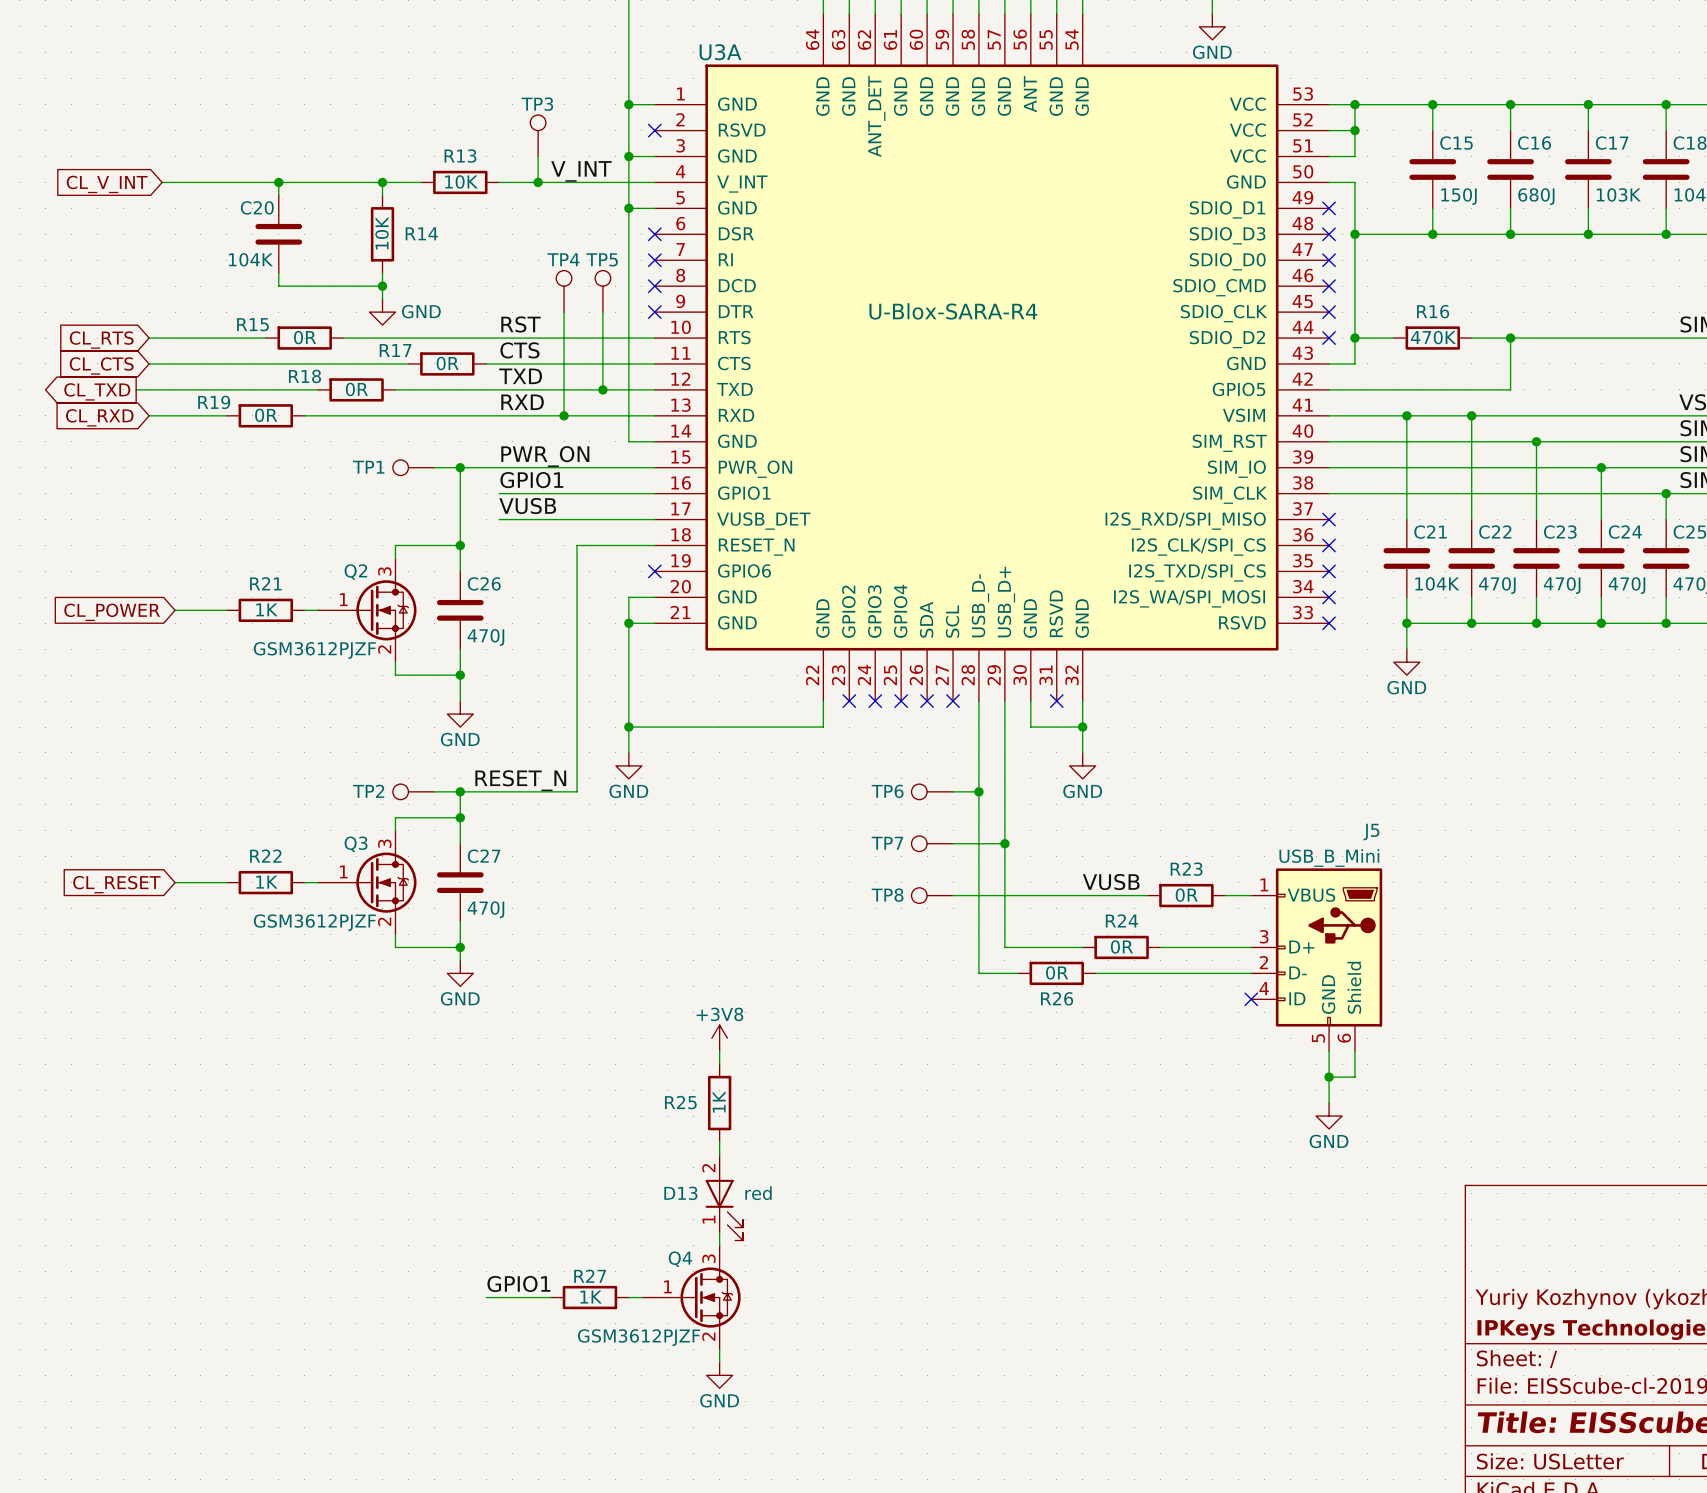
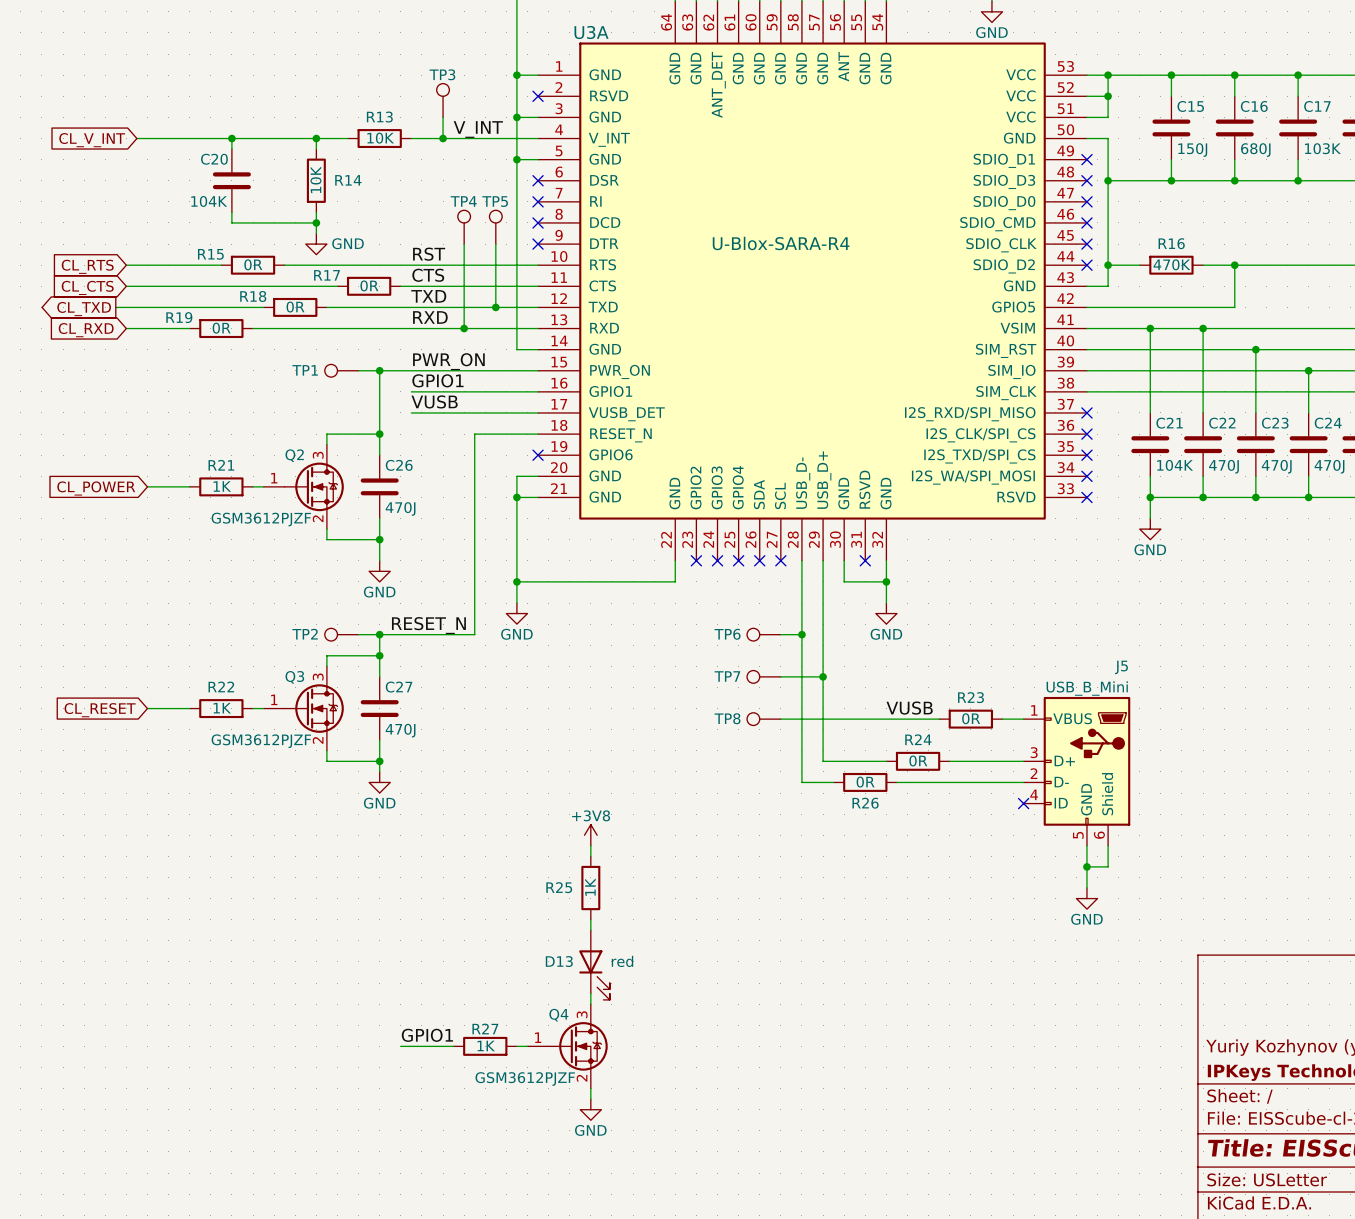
Q2 symbol: [317, 558, 417, 663] -> [263, 444, 344, 530]
Q3 symbol: [317, 830, 417, 935] -> [263, 666, 344, 751]
D13 symbol: [705, 1154, 743, 1241] -> [579, 930, 610, 1000]
Q4 symbol: [641, 1245, 741, 1350] -> [527, 1004, 608, 1089]

